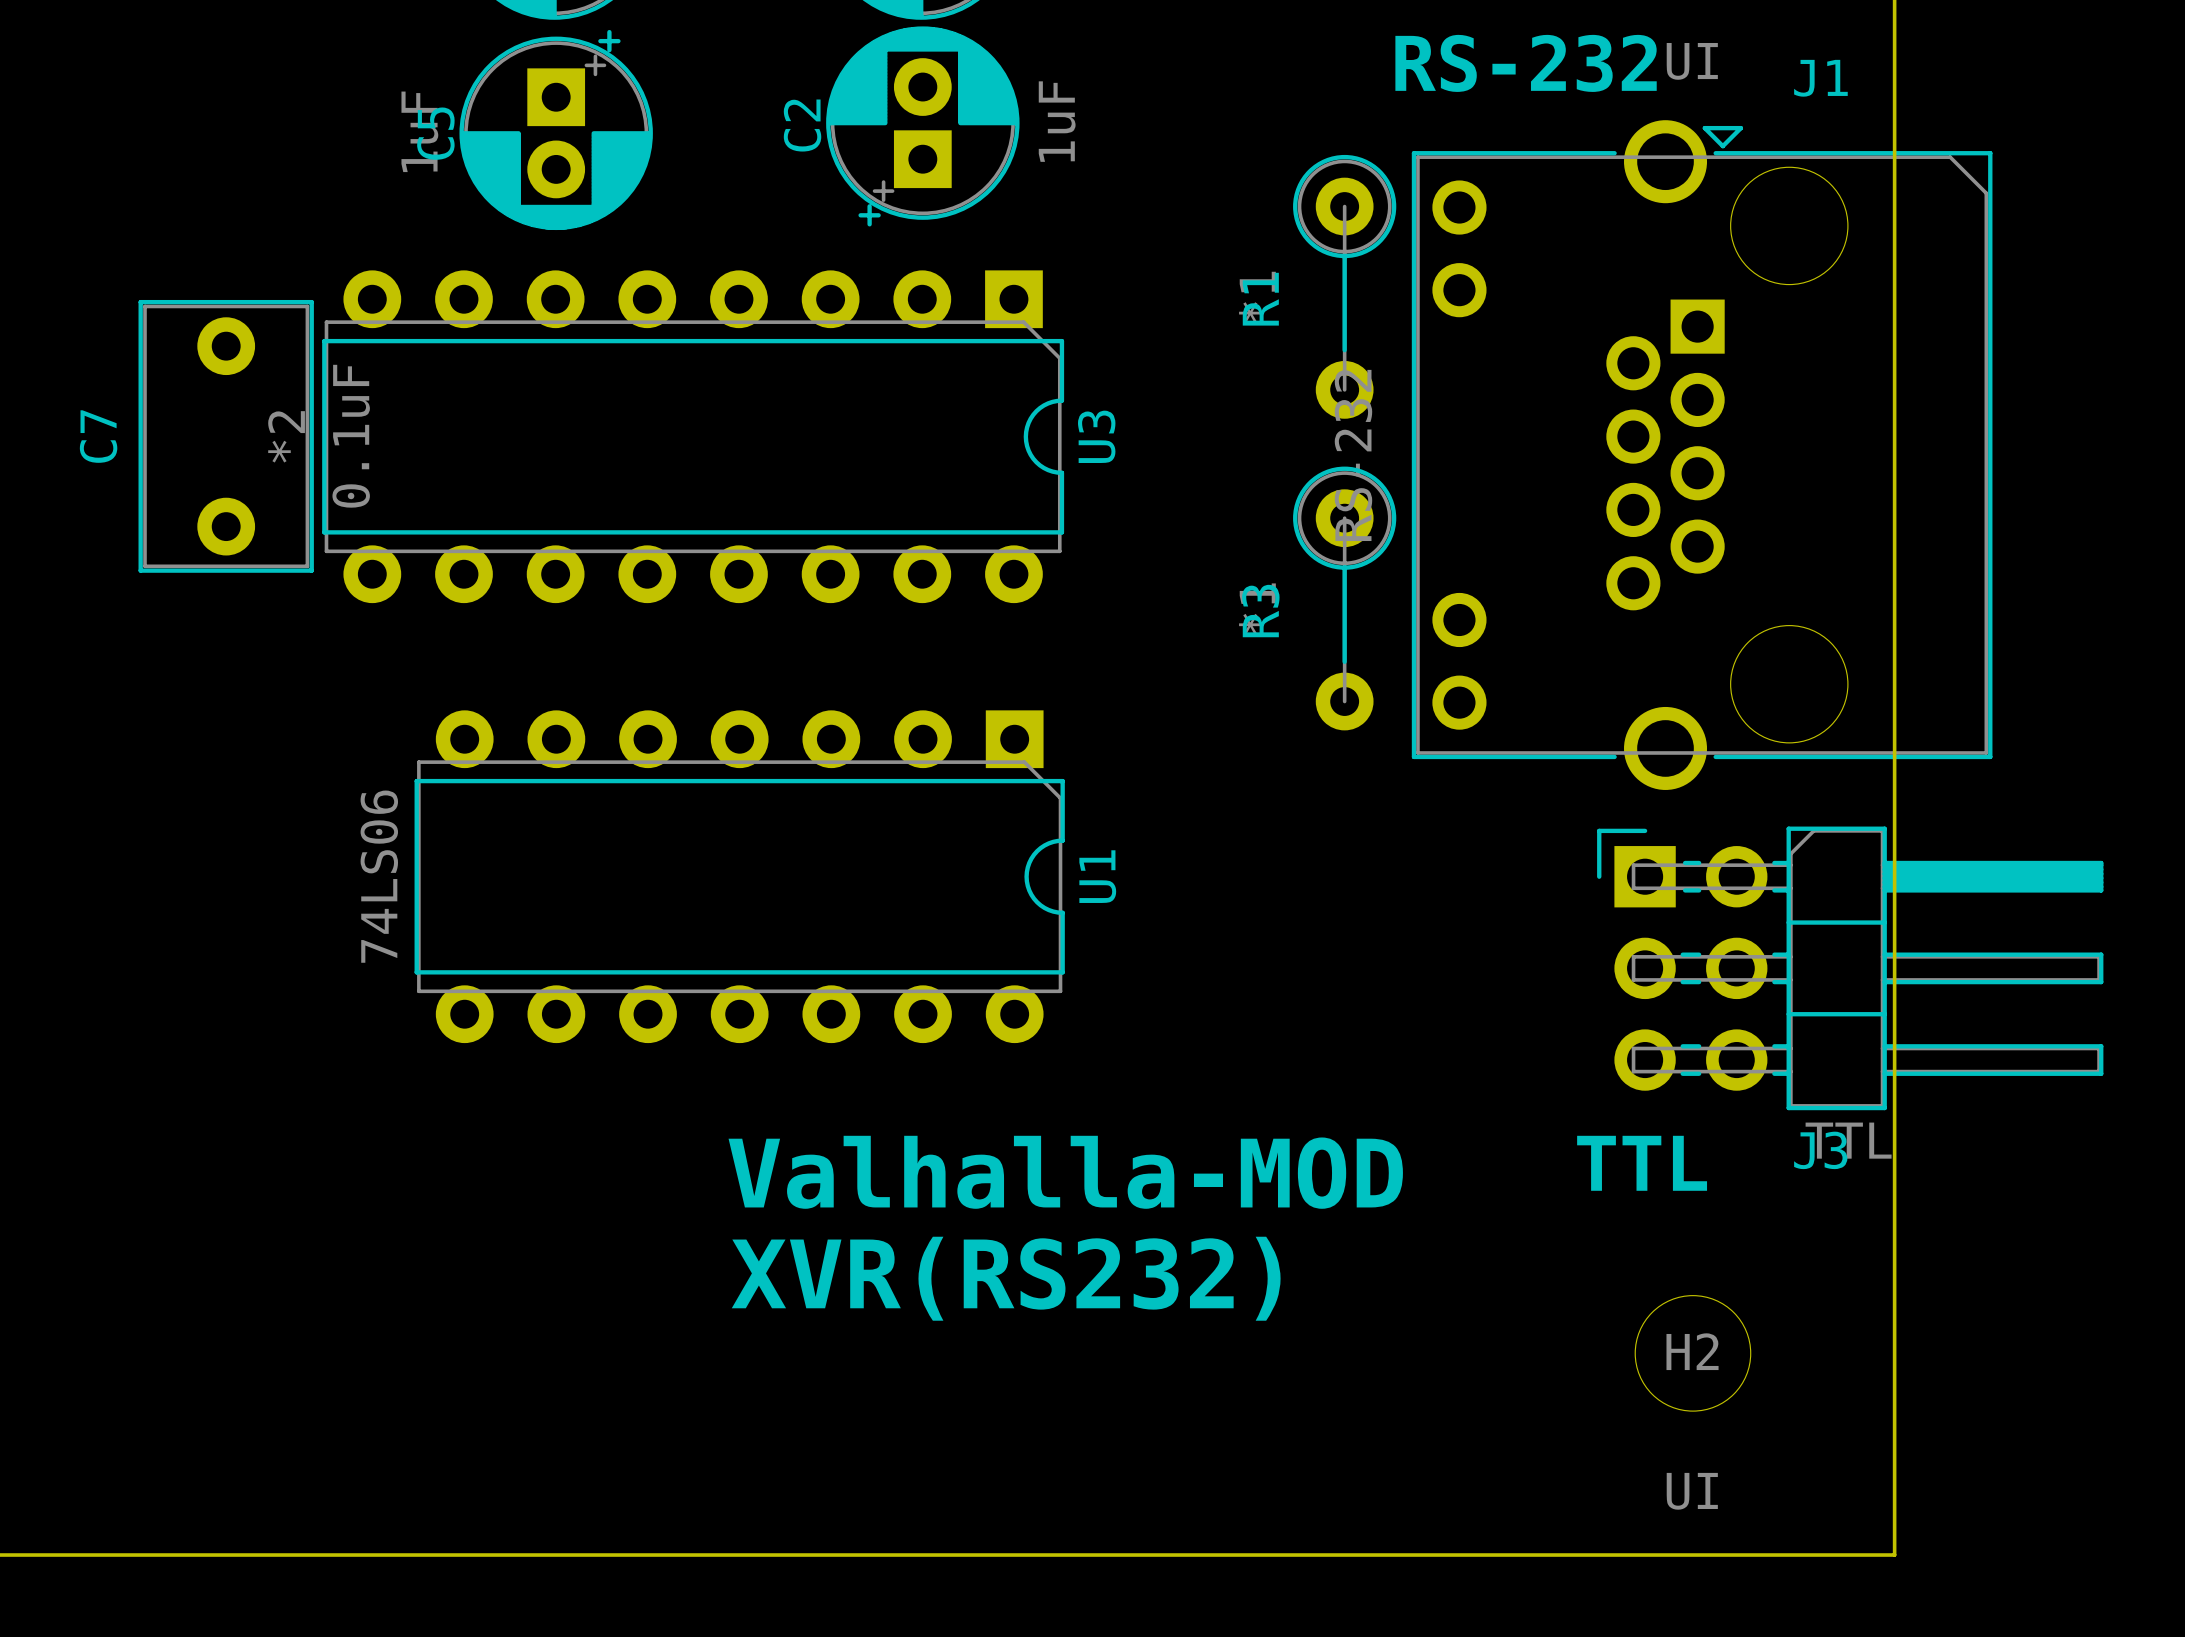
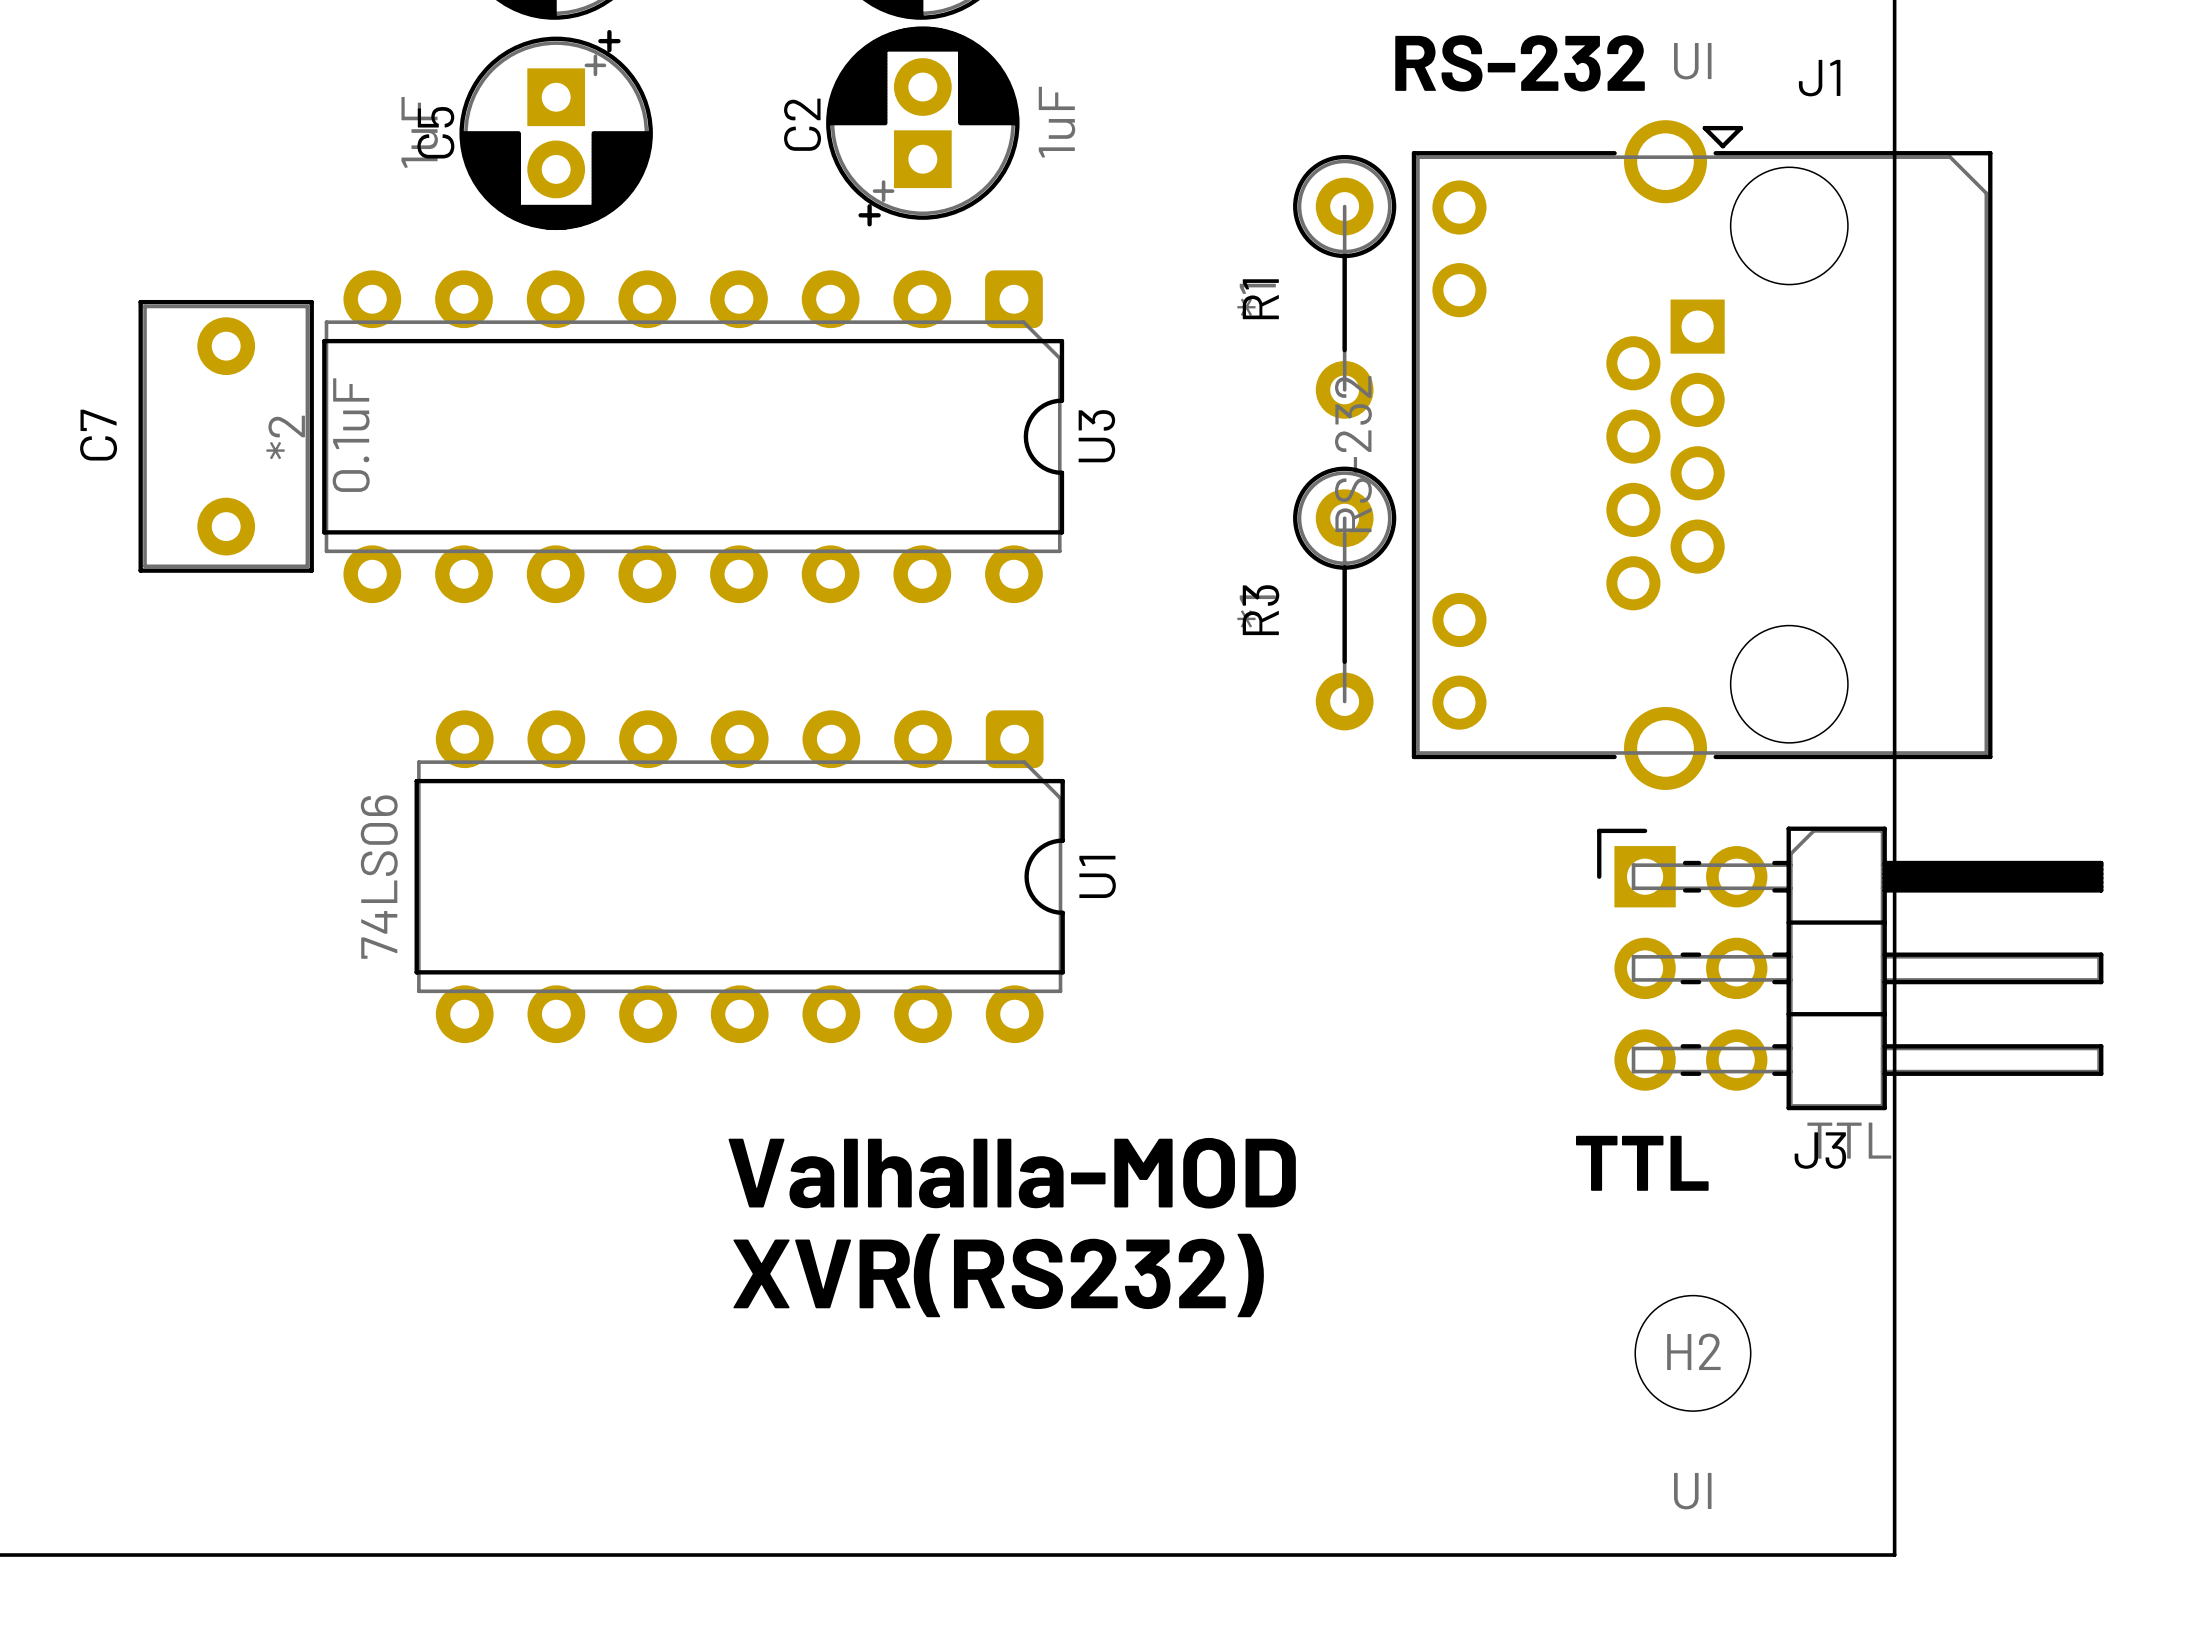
U3 footprint: [322, 270, 1065, 604] -> [322, 270, 1065, 604]
U1 footprint: [414, 710, 1065, 1044] -> [414, 710, 1065, 1044]

